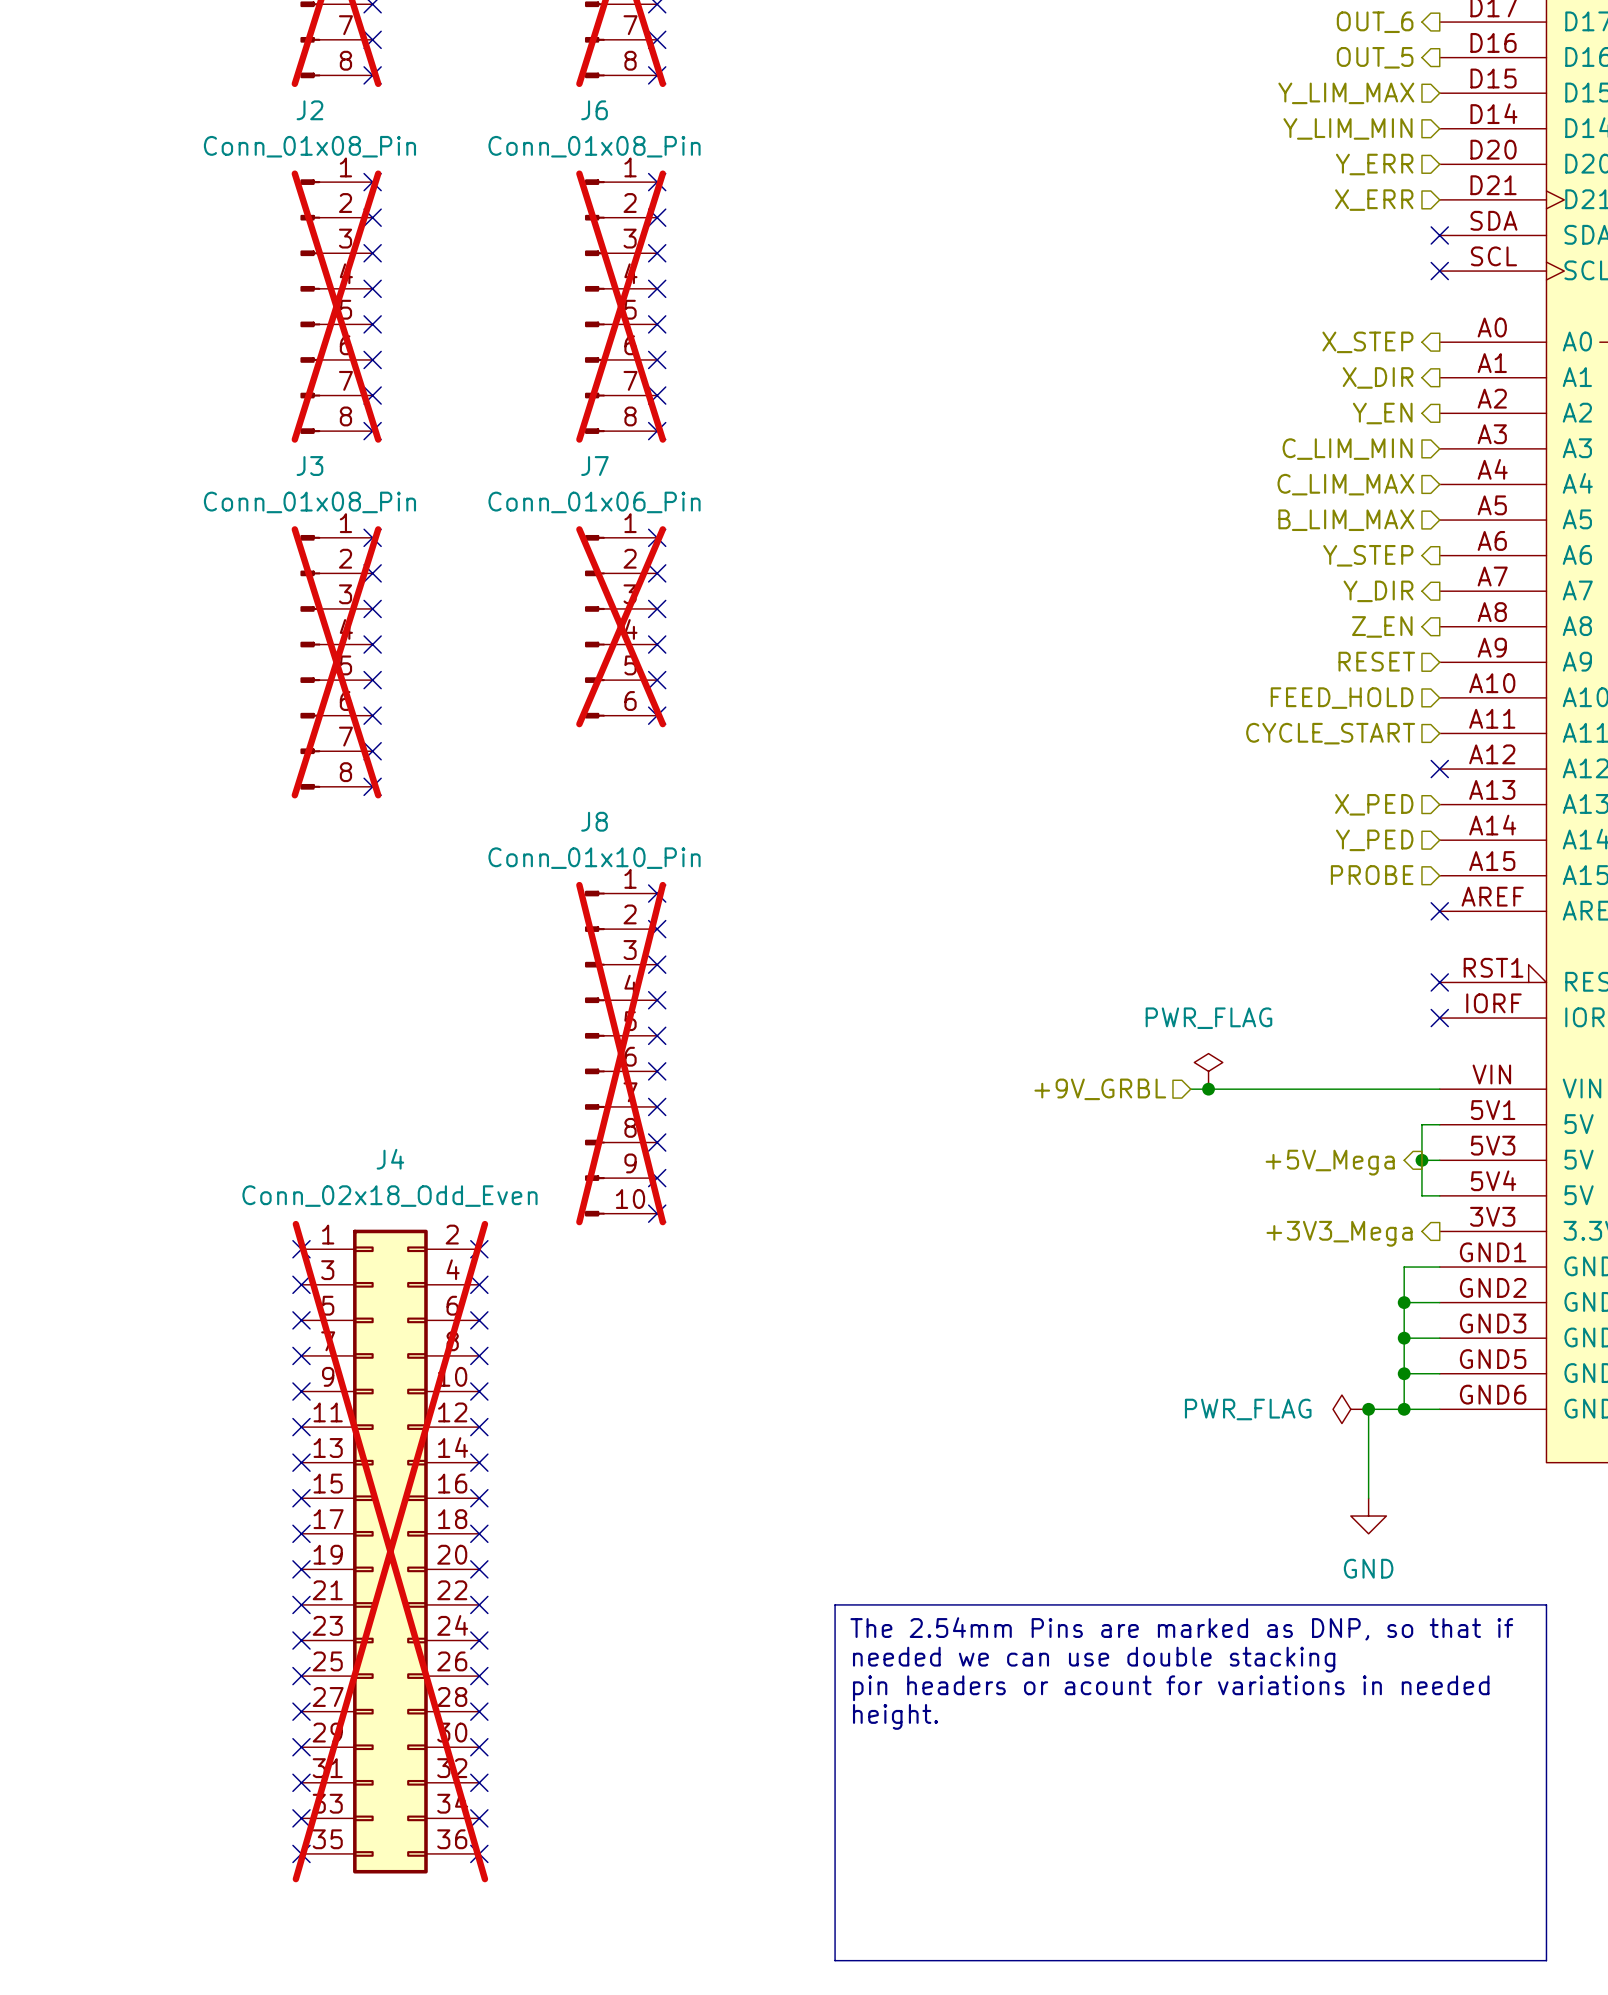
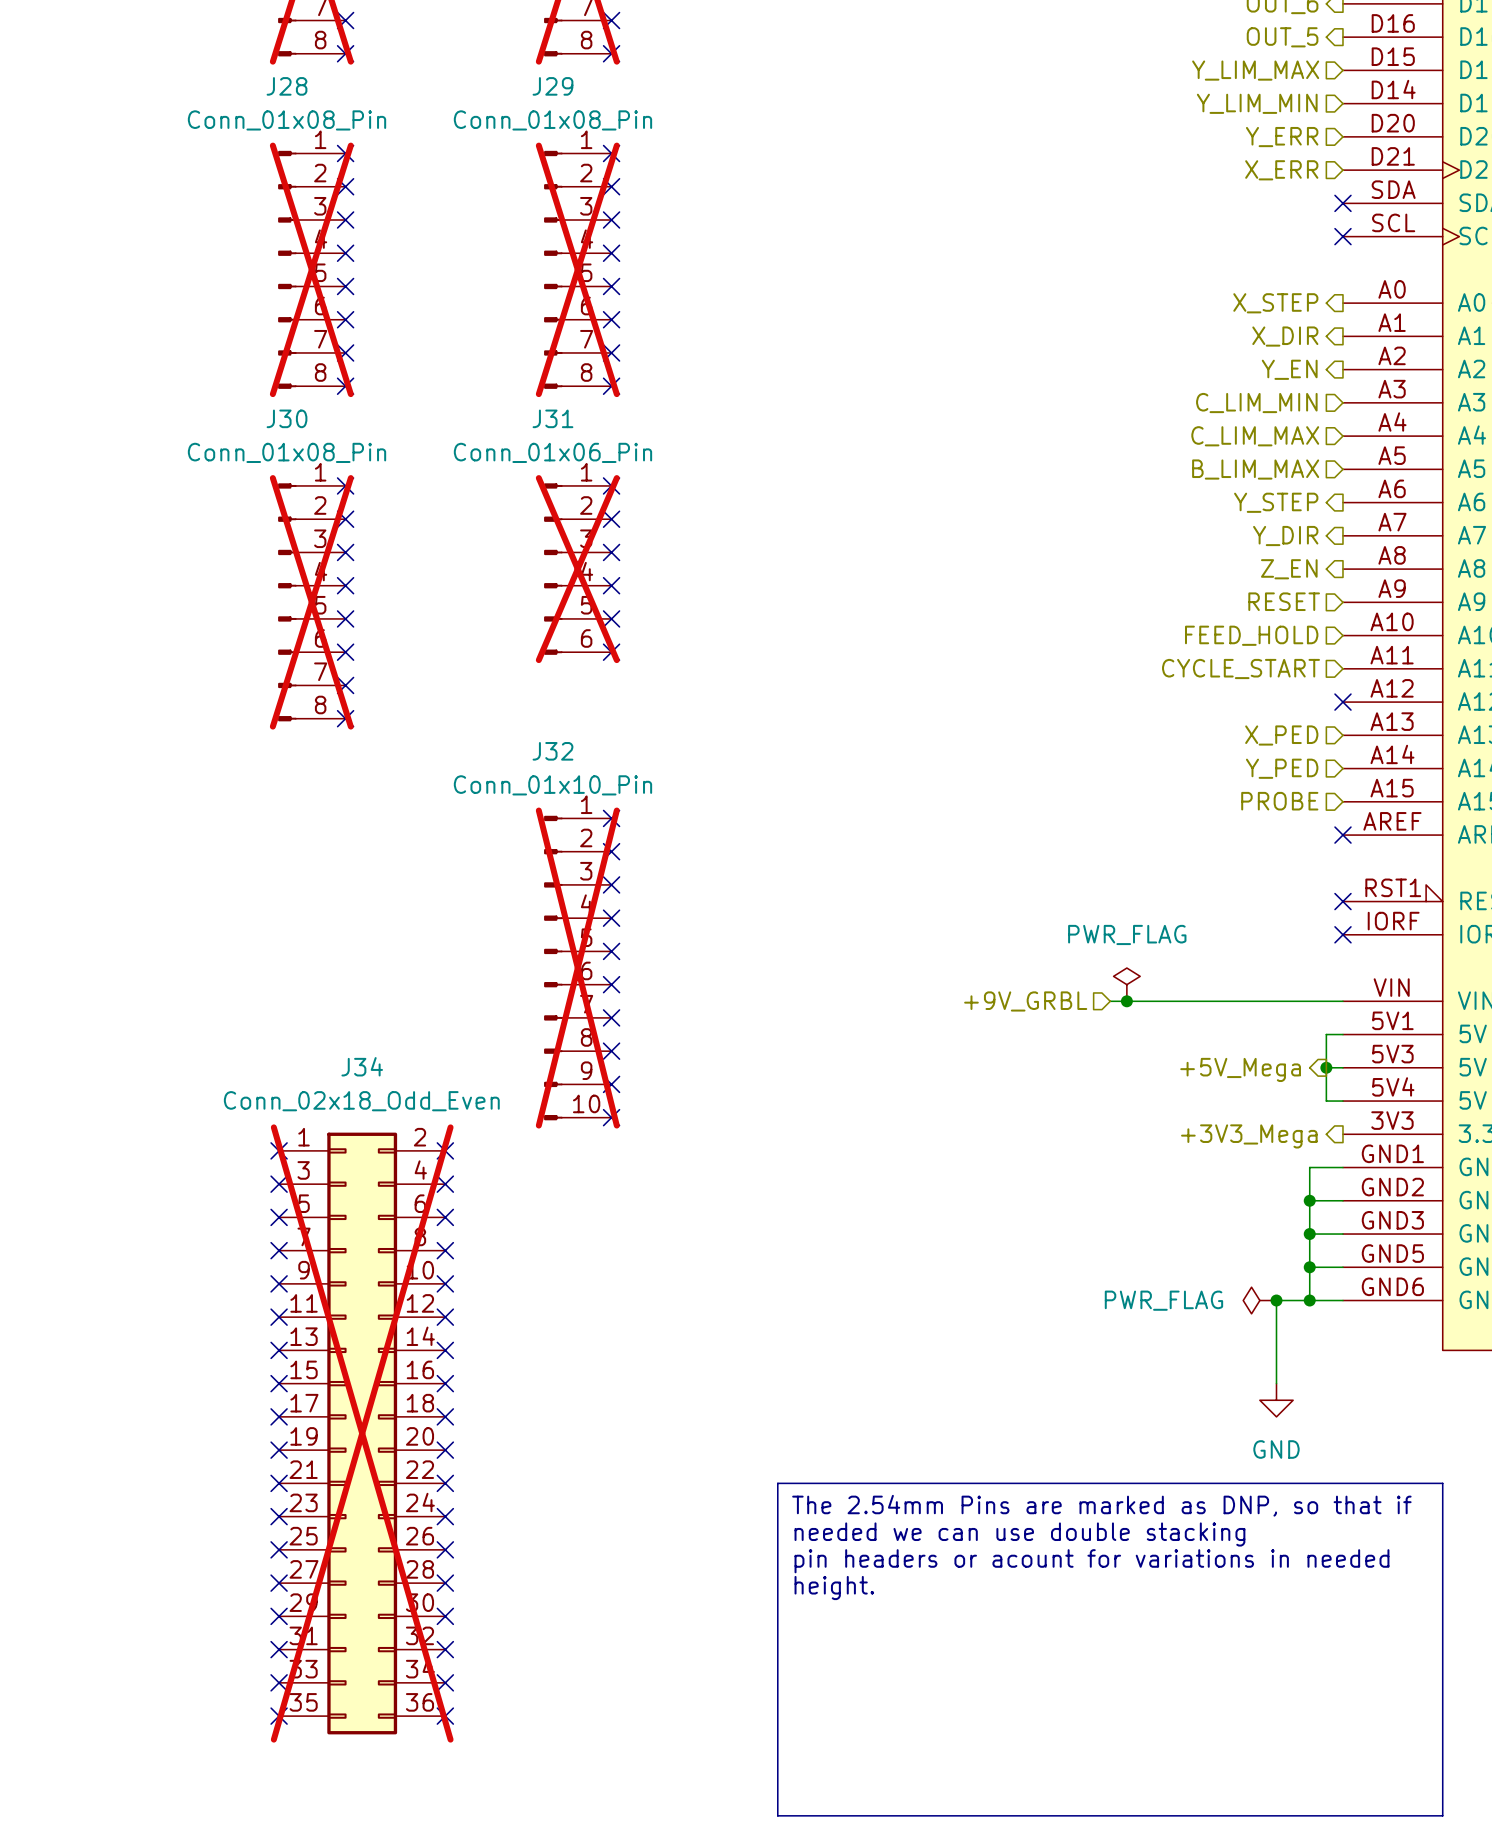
J2 name: J2 (309, 110) -> J28 (287, 86)
J6 name: J6 (594, 110) -> J29 (552, 86)
J3 name: J3 (309, 466) -> J30 (287, 418)
J7 name: J7 (594, 466) -> J31 (552, 418)
J8 name: J8 (594, 821) -> J32 (552, 751)
J4 name: J4 (390, 1159) -> J34 (362, 1066)

